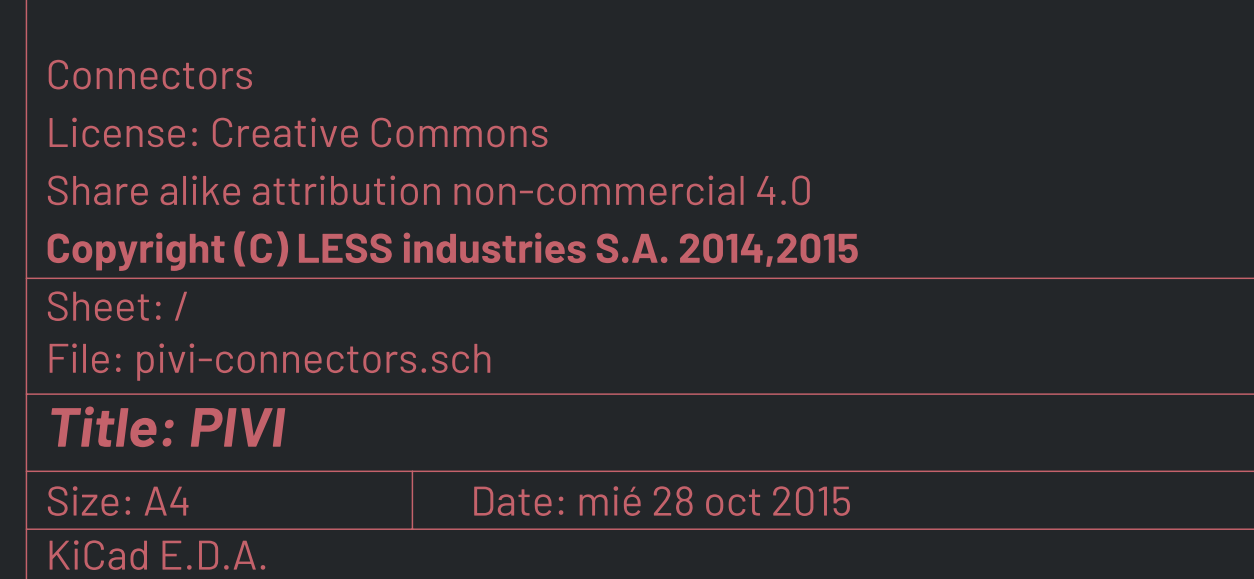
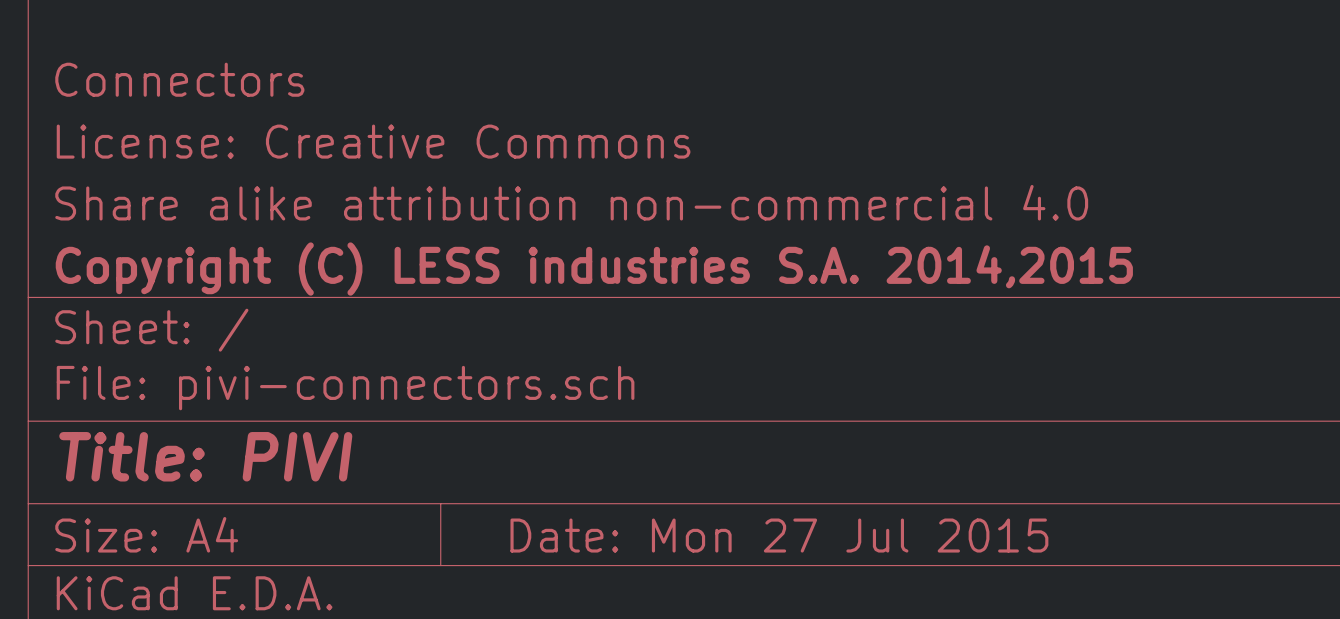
title block: Date: mié 28 oct 2015 (662, 501) -> Date: Mon 27 Jul 2015 (779, 535)

